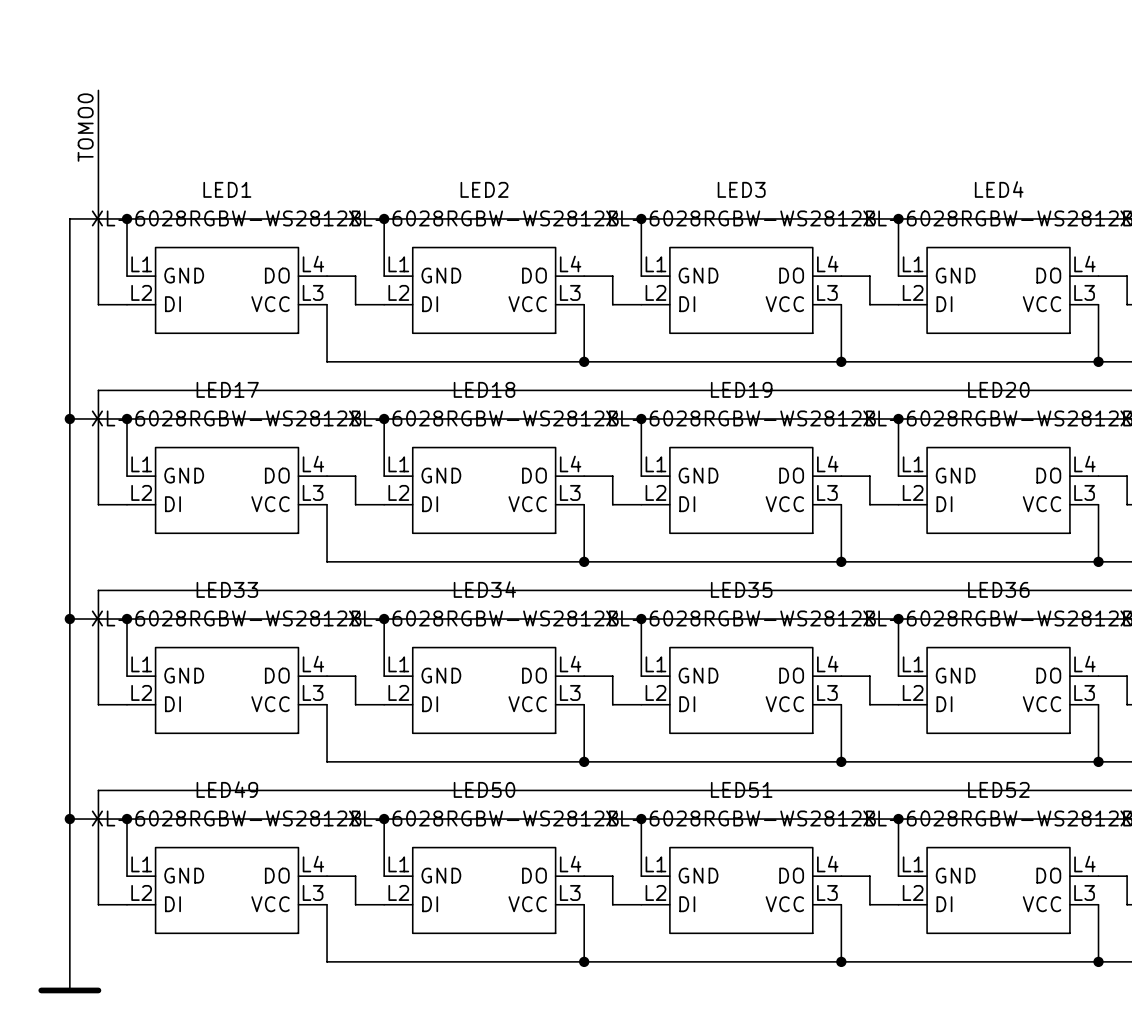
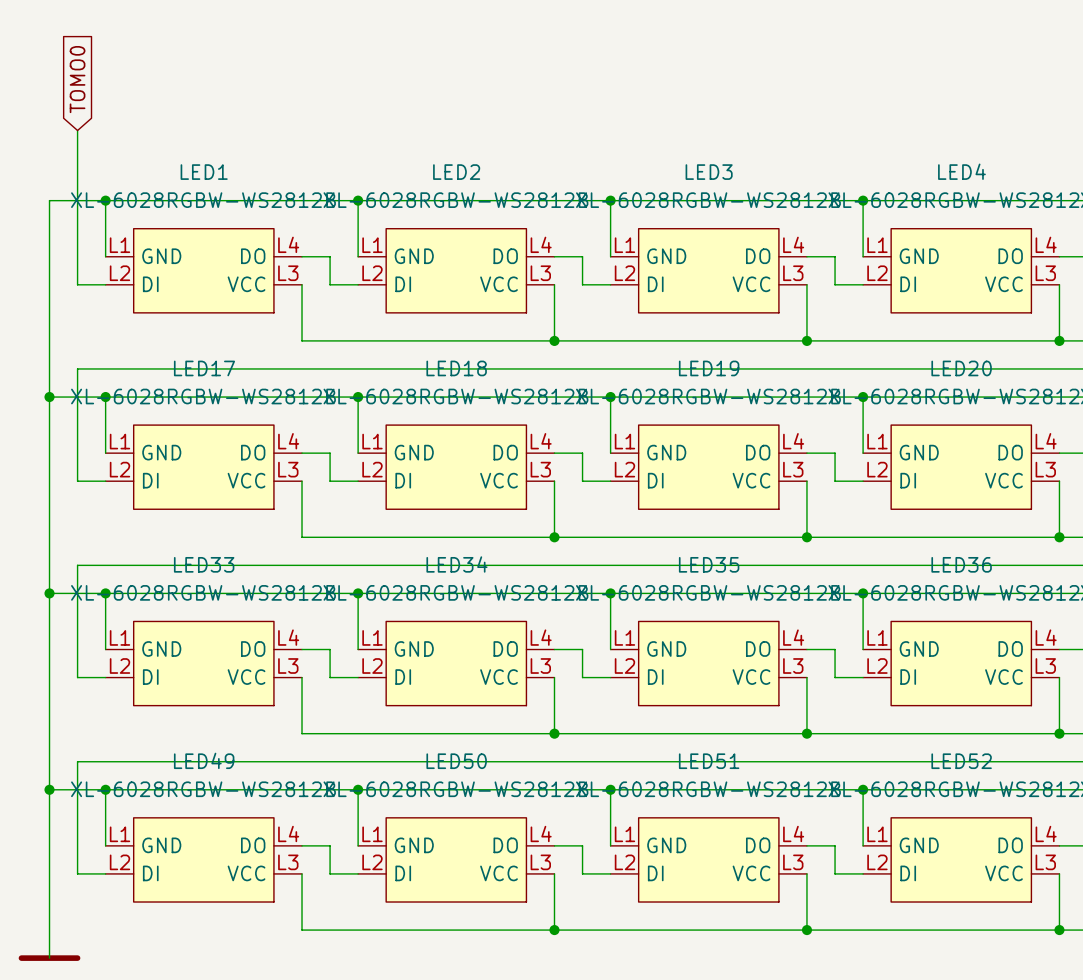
wire: (98, 90) (98, 147) -> none
global label: none -> TOMO0 (77, 79)
label: TOMO0 (85, 127) -> none

